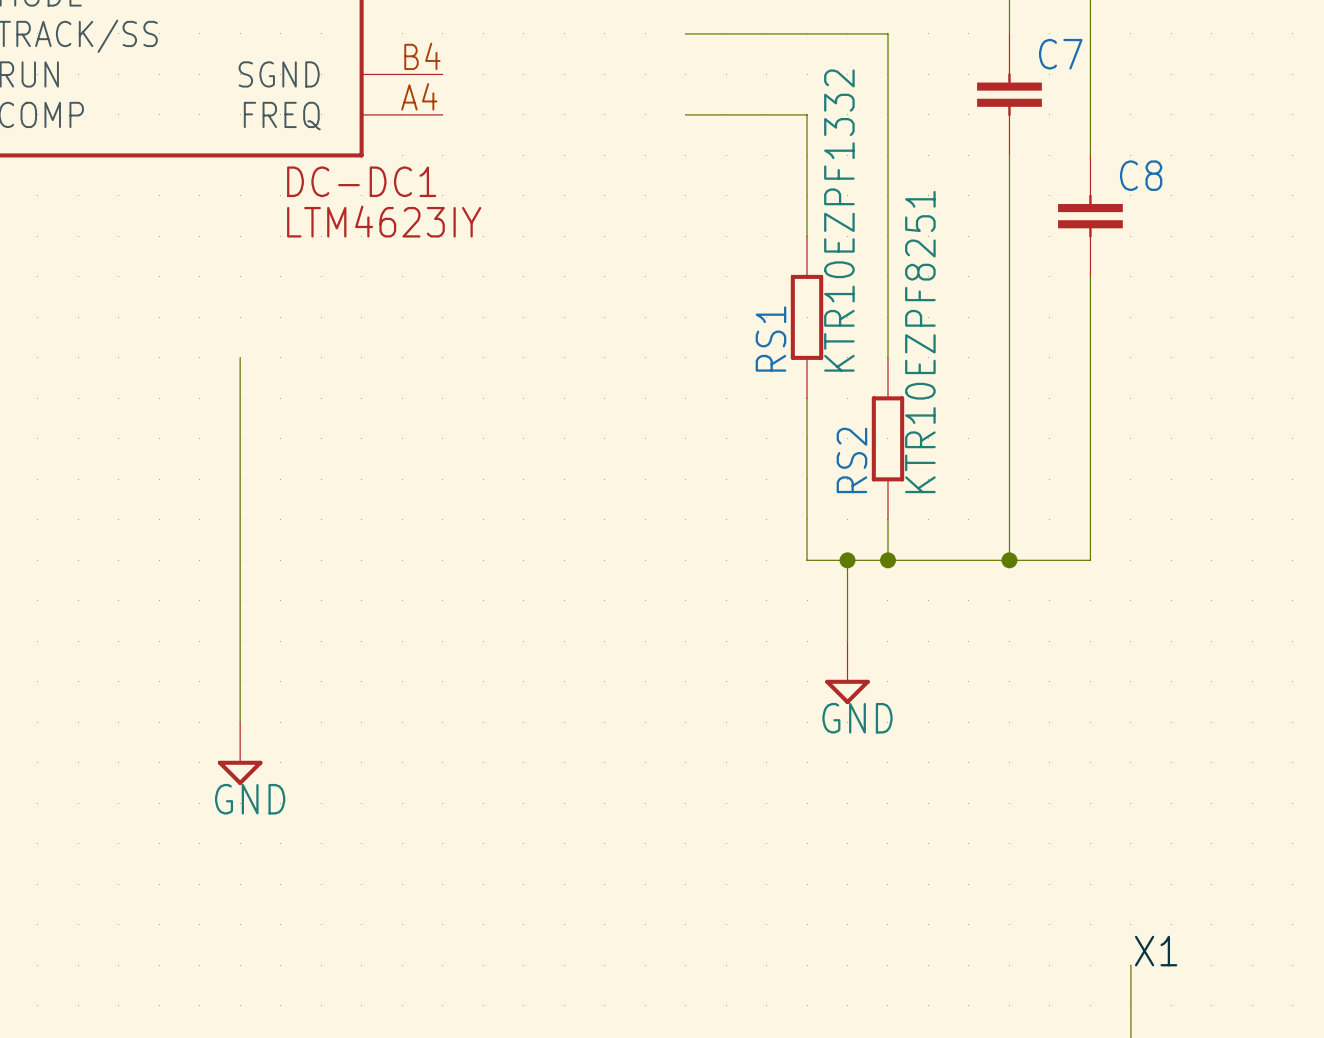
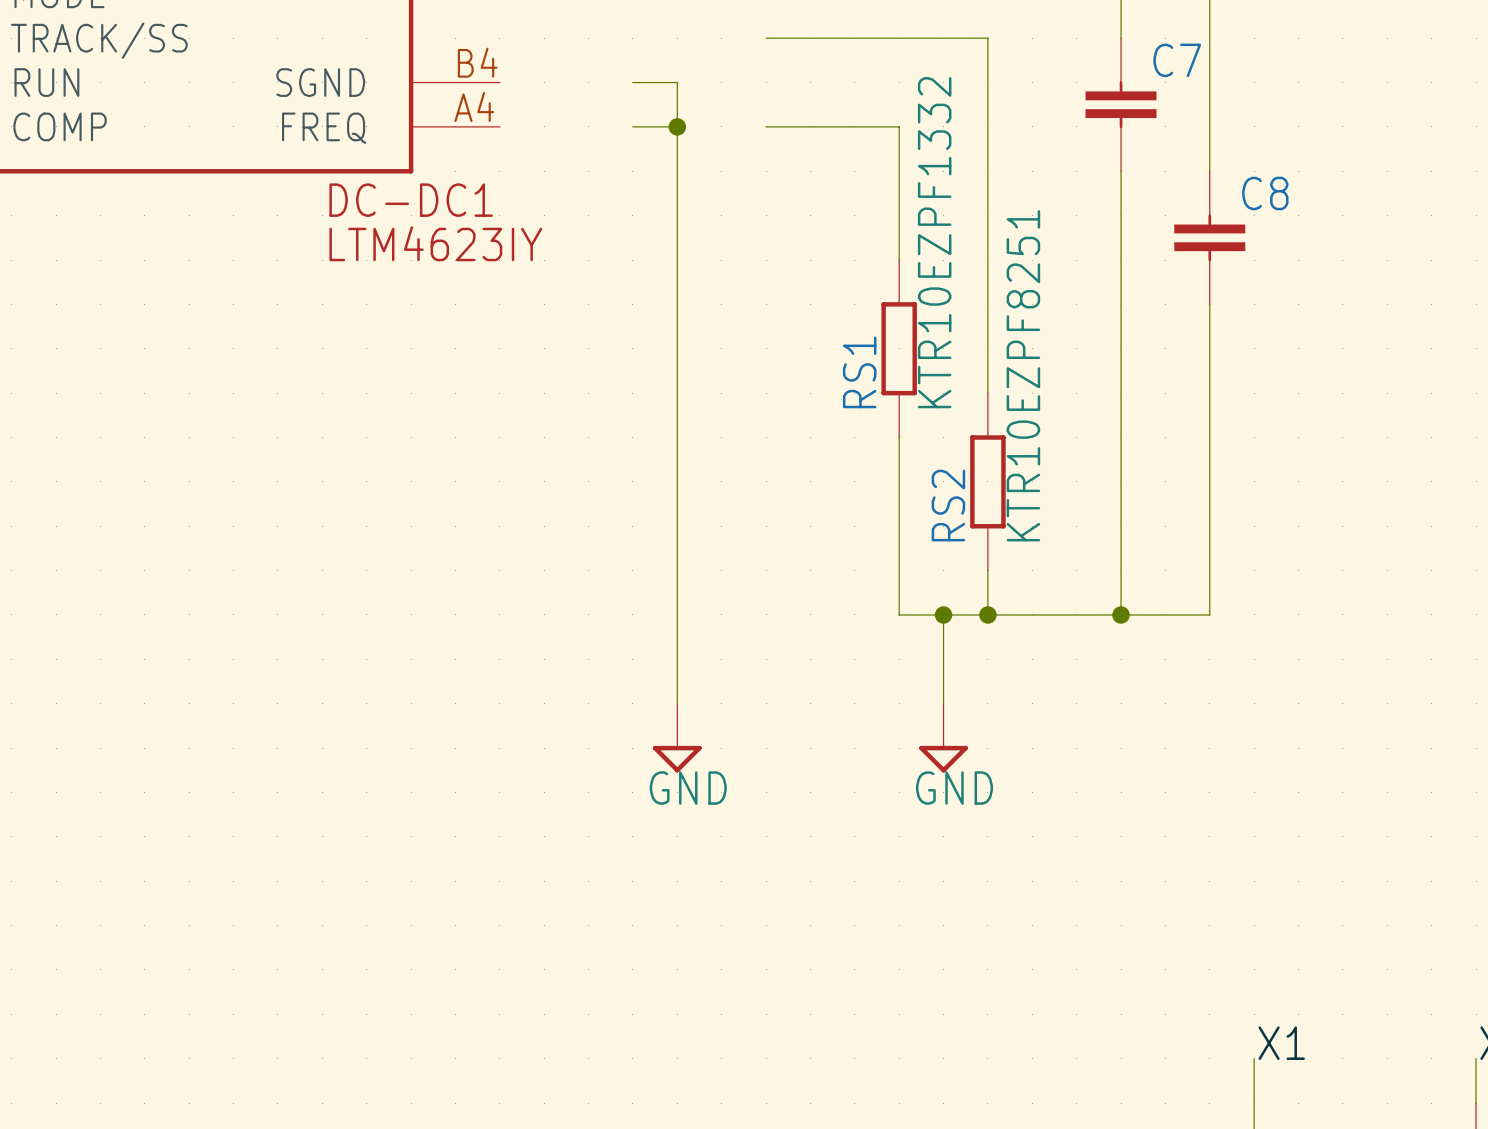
wire: none -> (632, 82) (677, 82) (677, 703)
wire: none -> (632, 126) (677, 126)
junction: none -> (677, 126)
wire: (240, 357) (240, 722) -> none
power symbol position: GND (240, 753) -> GND (677, 738)

